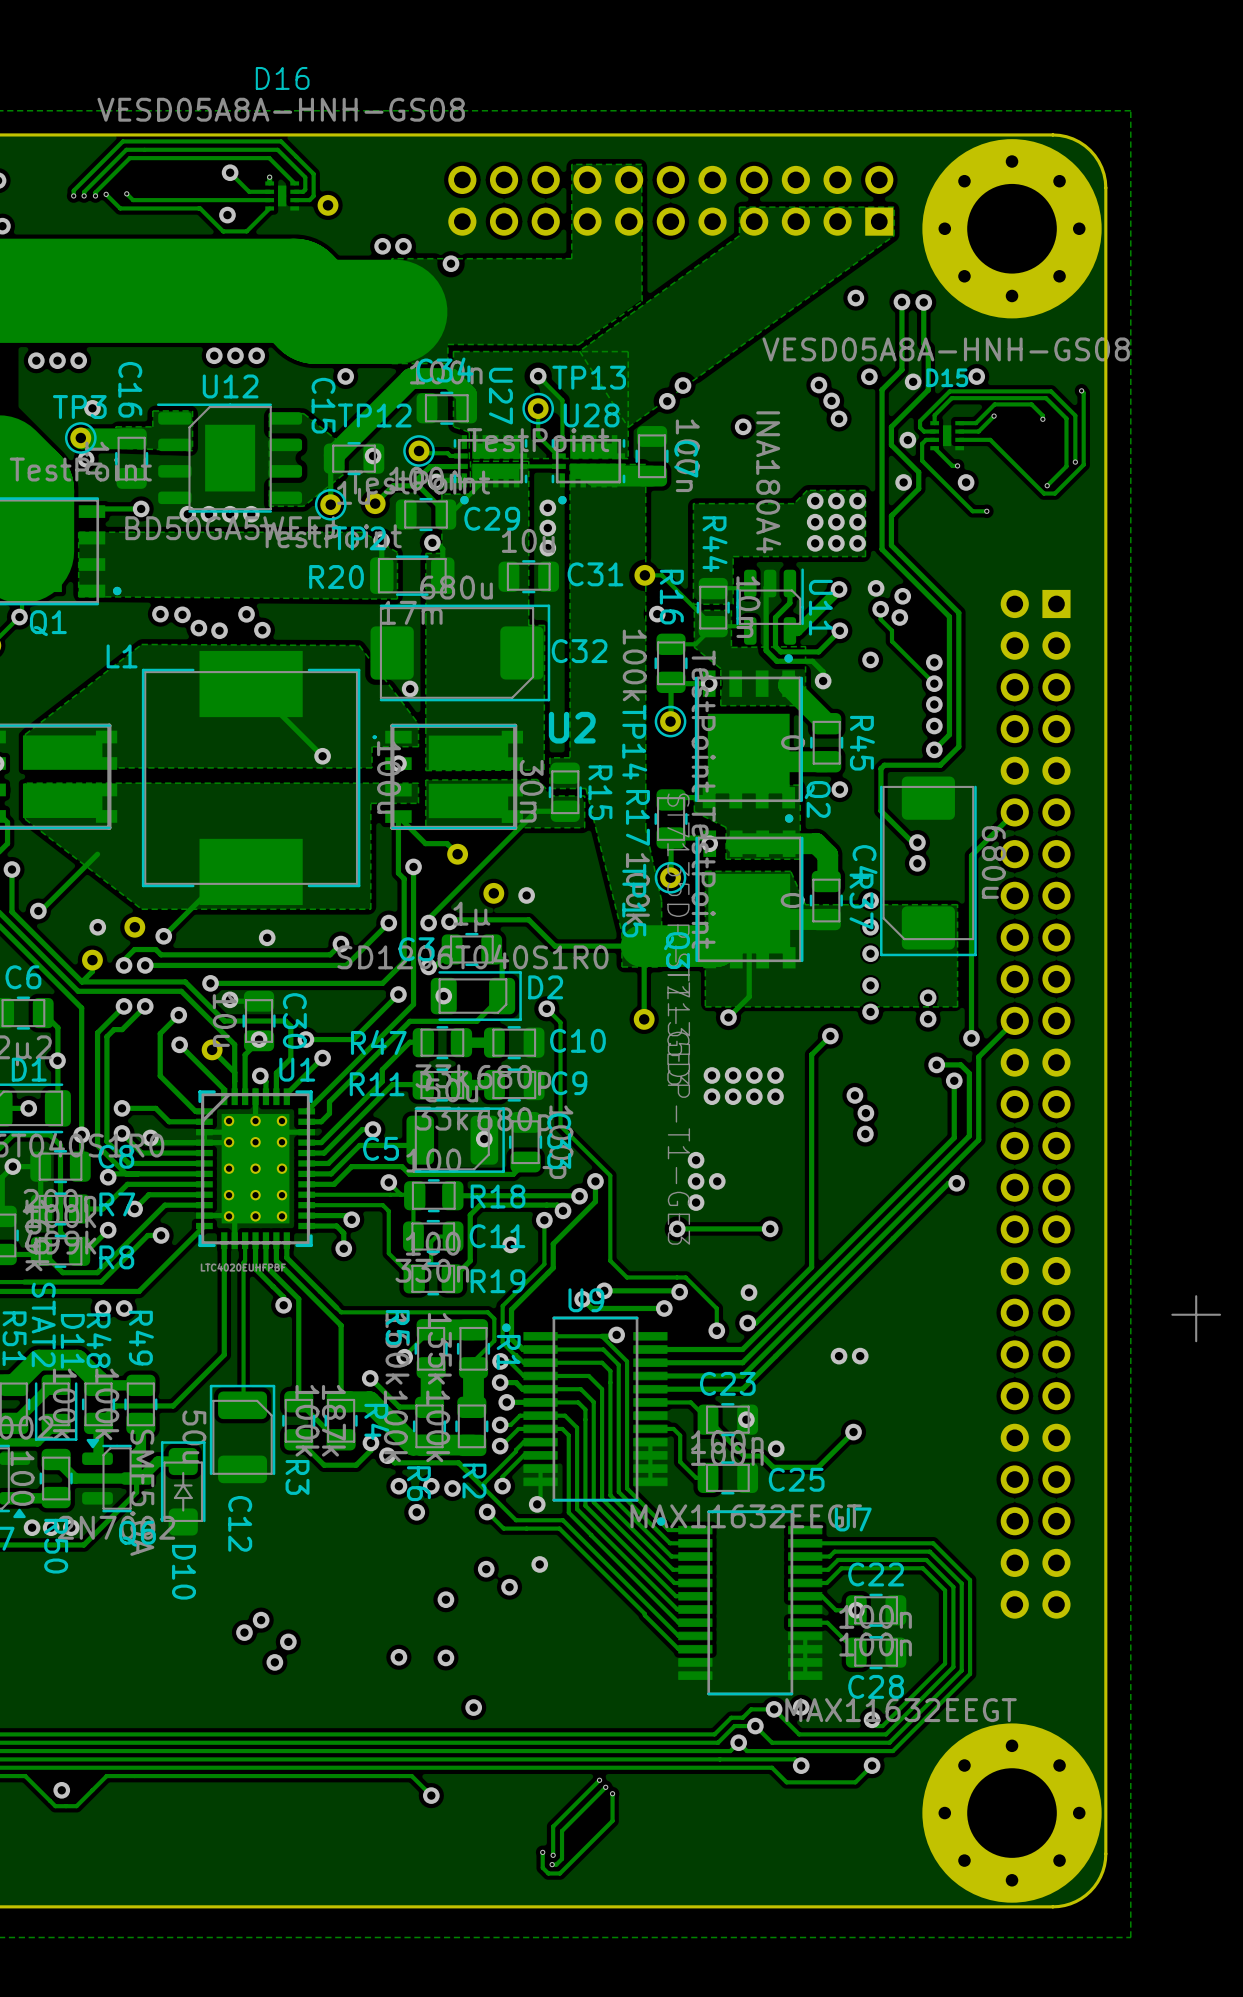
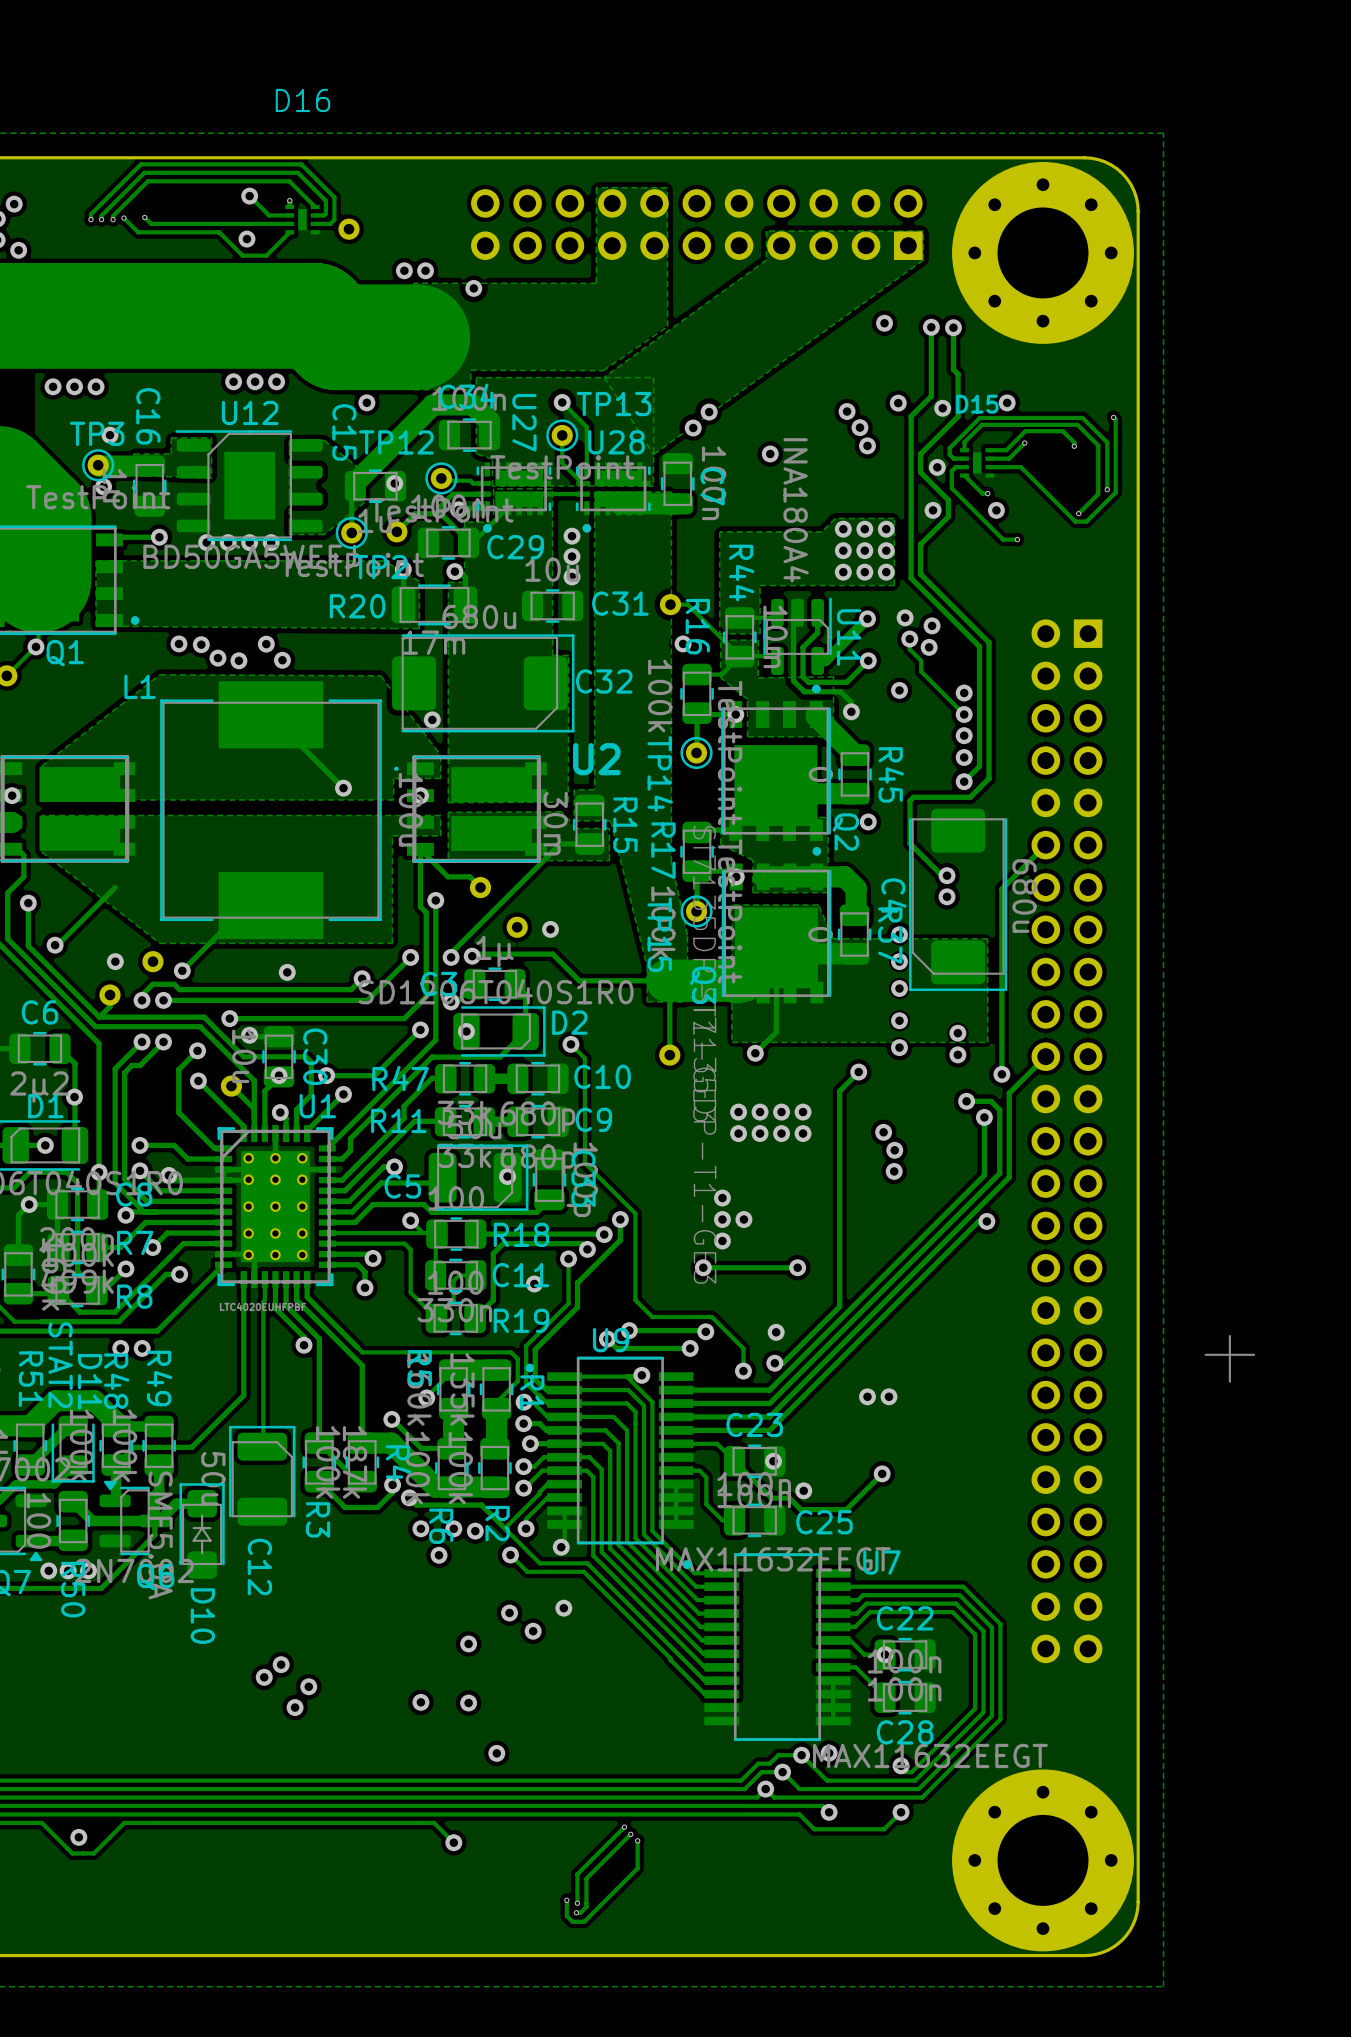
D16 value: VESD05A8A-HNH-GS08 (281, 109) -> none
D15 value: VESD05A8A-HNH-GS08 (946, 349) -> none

